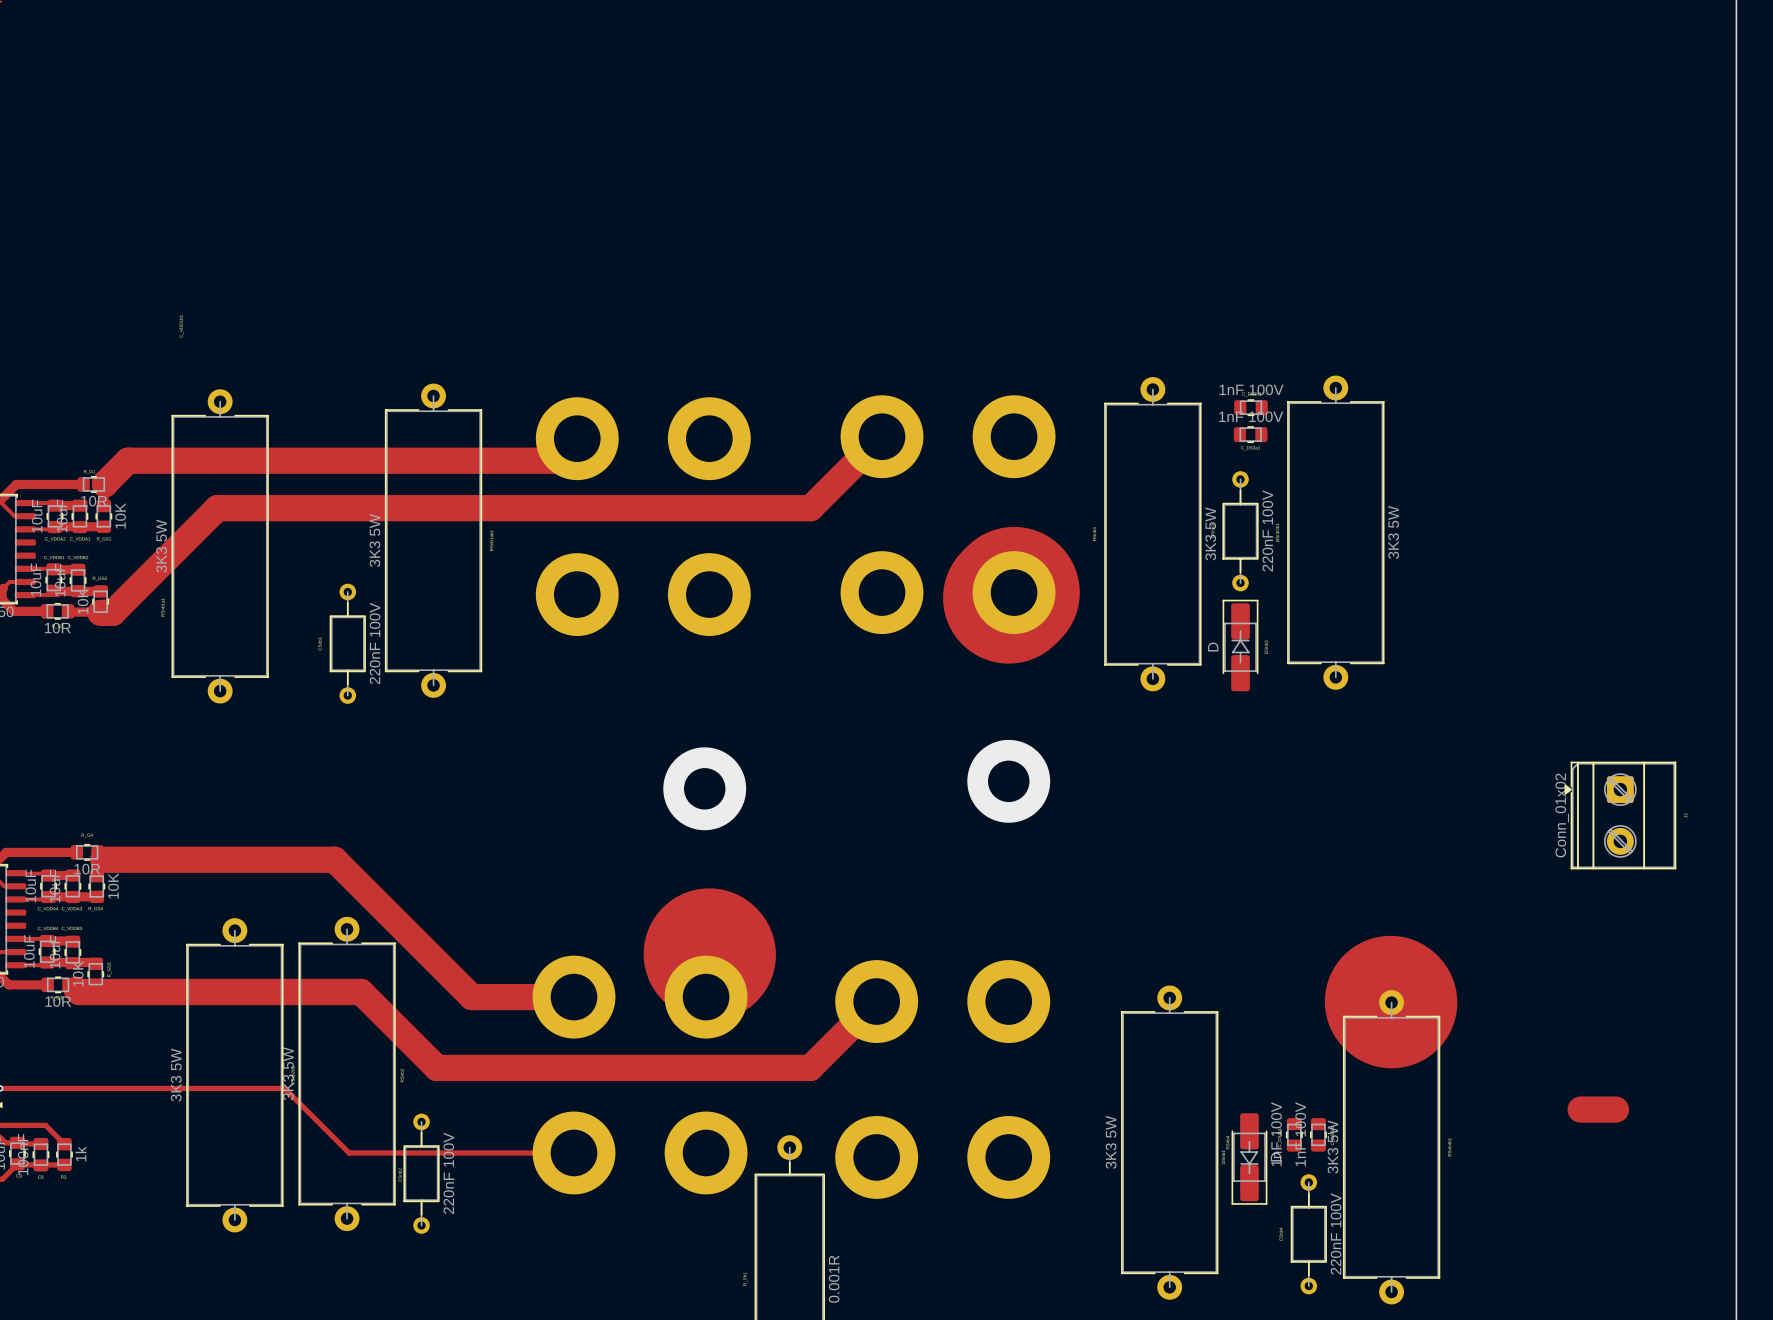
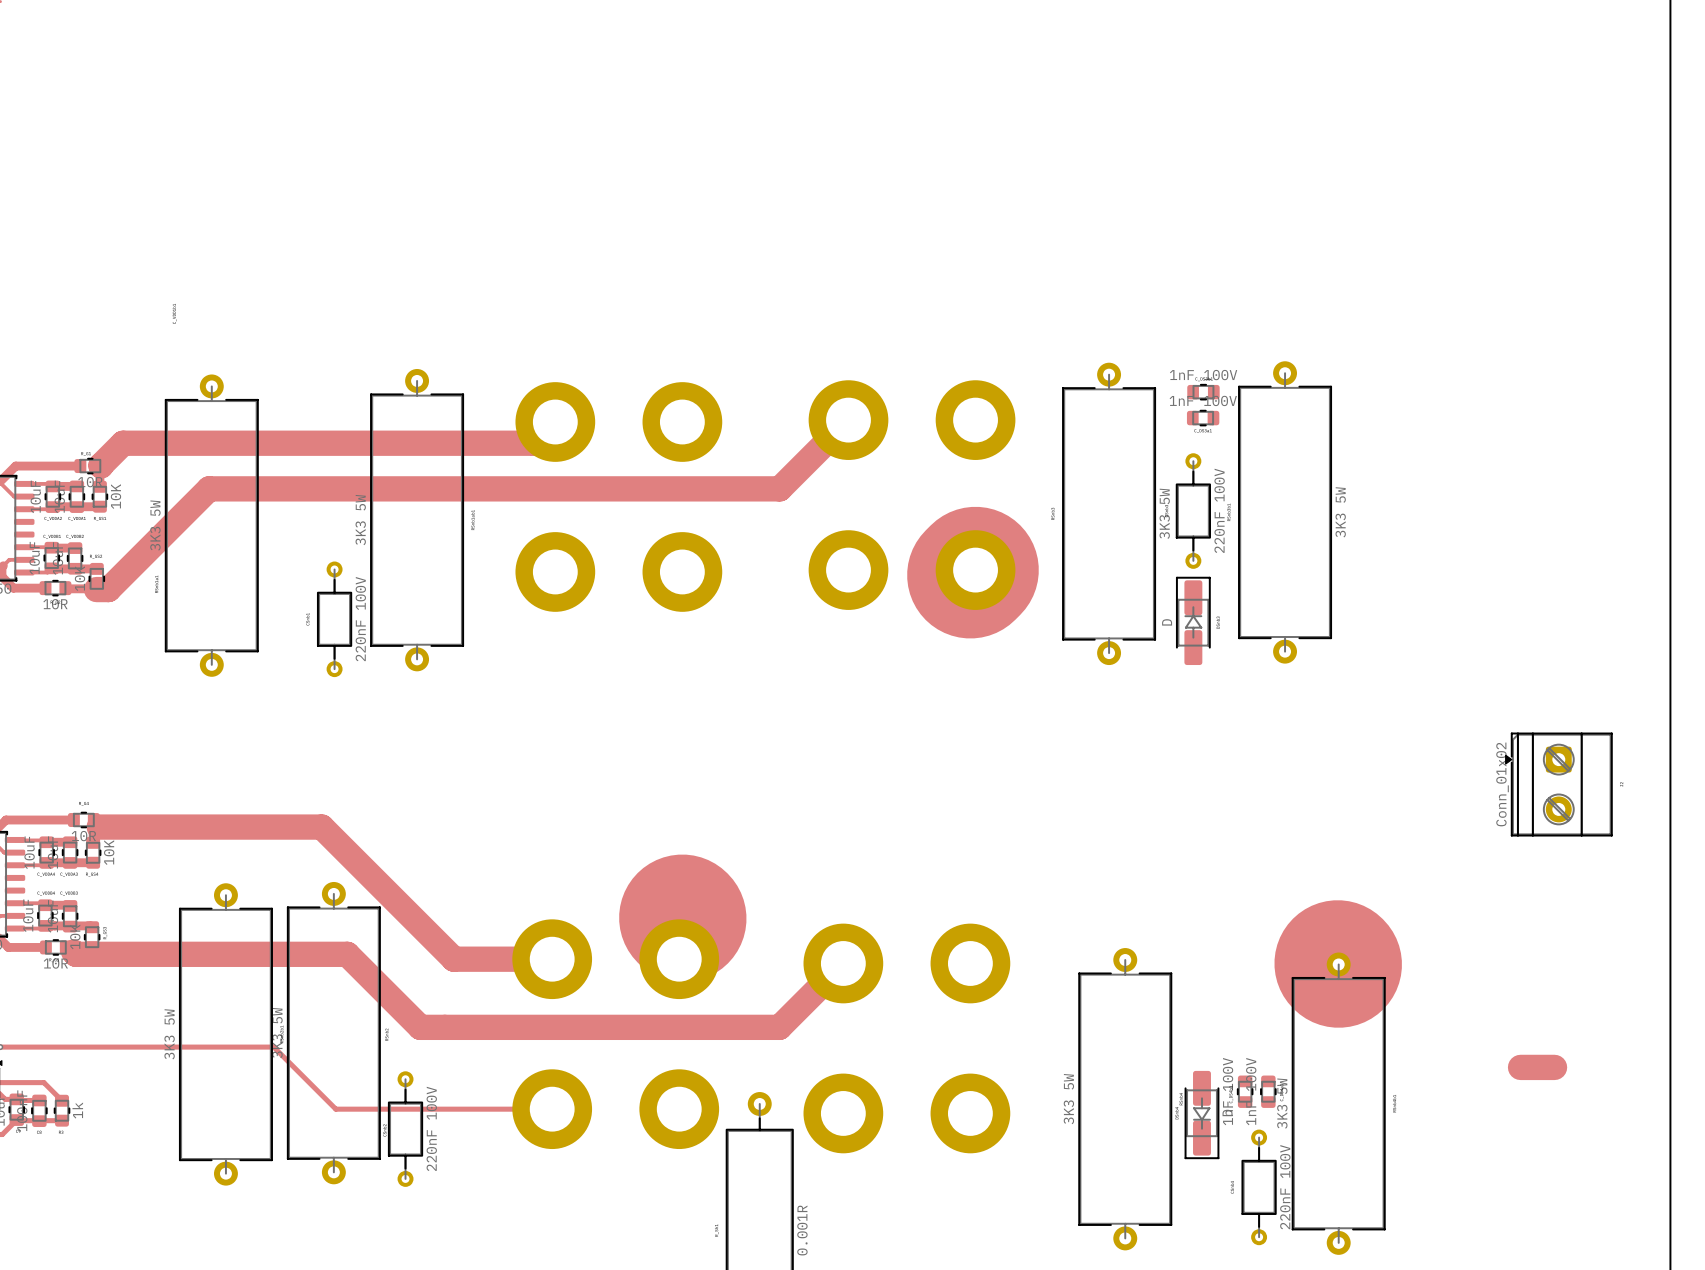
via: (1008, 781) -> none
via: (704, 788) -> none

